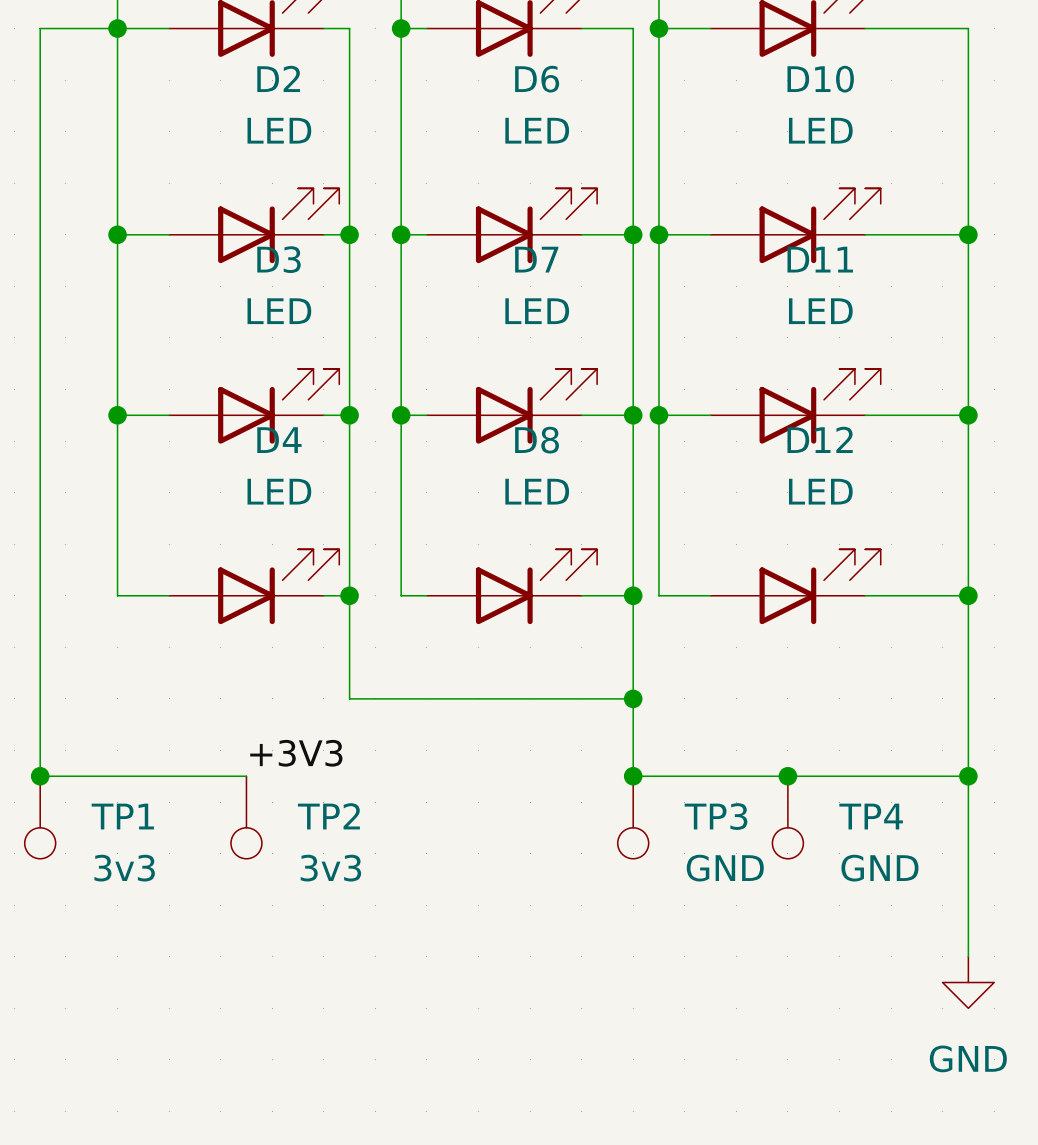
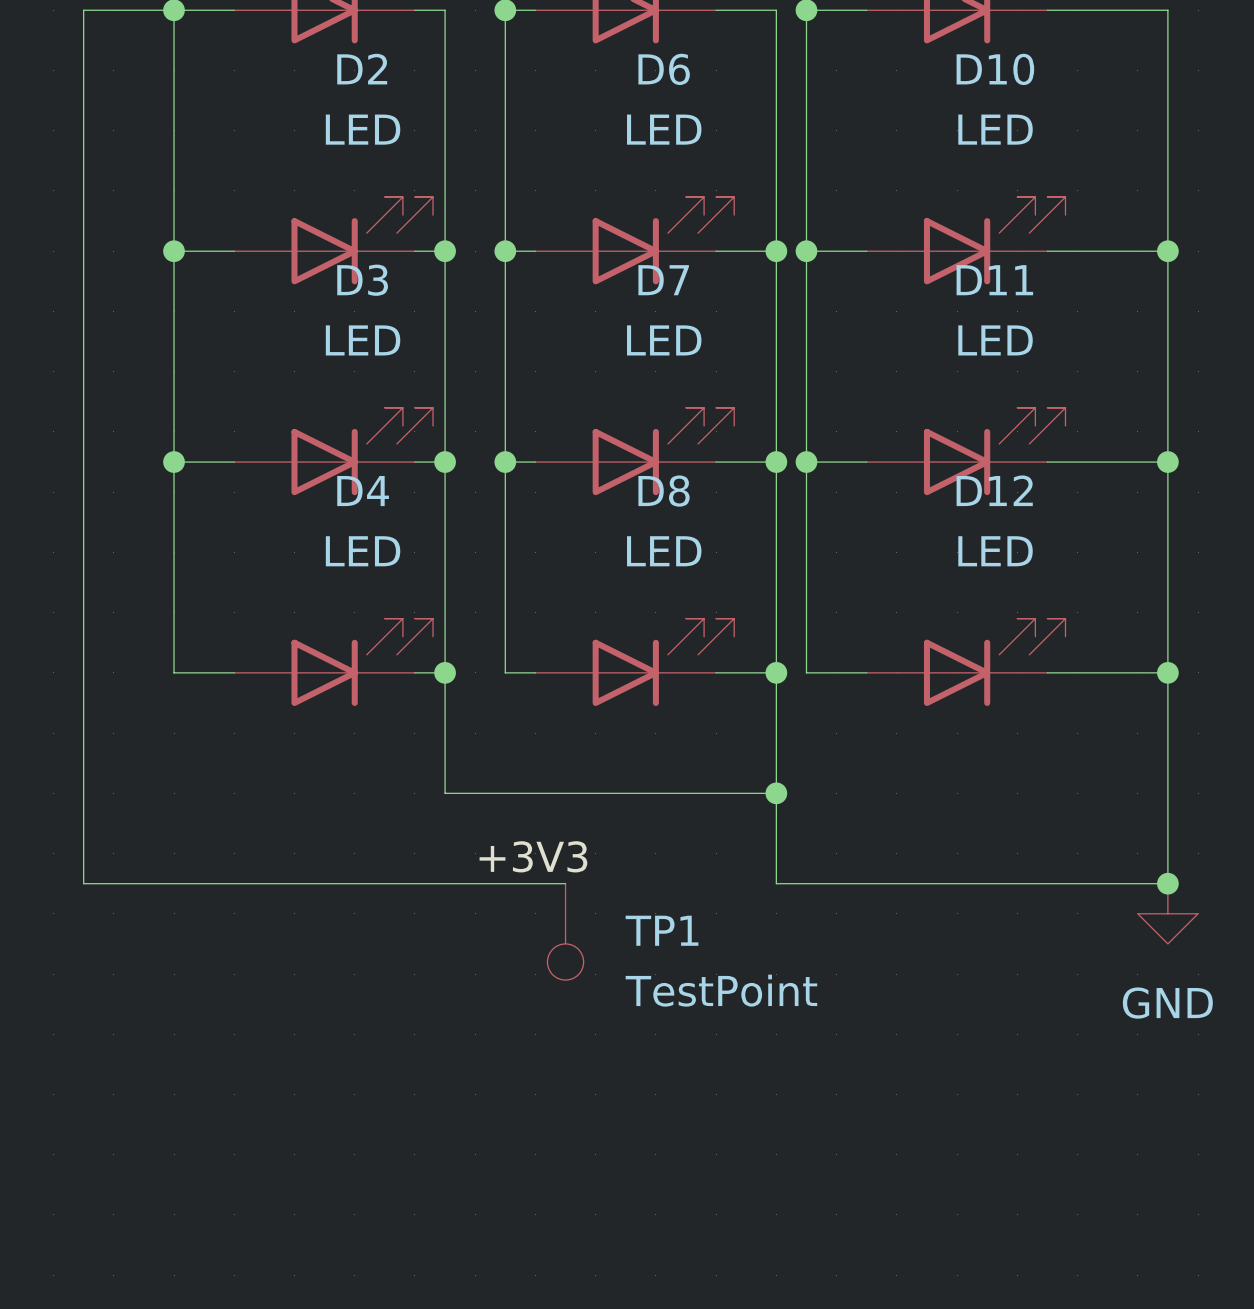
label position: +3V3 (296, 753) -> +3V3 (533, 856)
junction: (40, 776) -> none
wire: none -> (324, 883) (565, 883)
junction: (633, 776) -> none
junction: (787, 776) -> none
wire: (968, 776) (968, 956) -> none
TP1 position: (40, 817) -> (565, 931)
TP2: 3v3 (246, 817) -> none
TP3: GND (633, 817) -> none
TP4: GND (787, 817) -> none
TP1 value: 3v3 (124, 868) -> TestPoint (721, 990)
power symbol position: GND (968, 982) -> GND (1167, 913)

